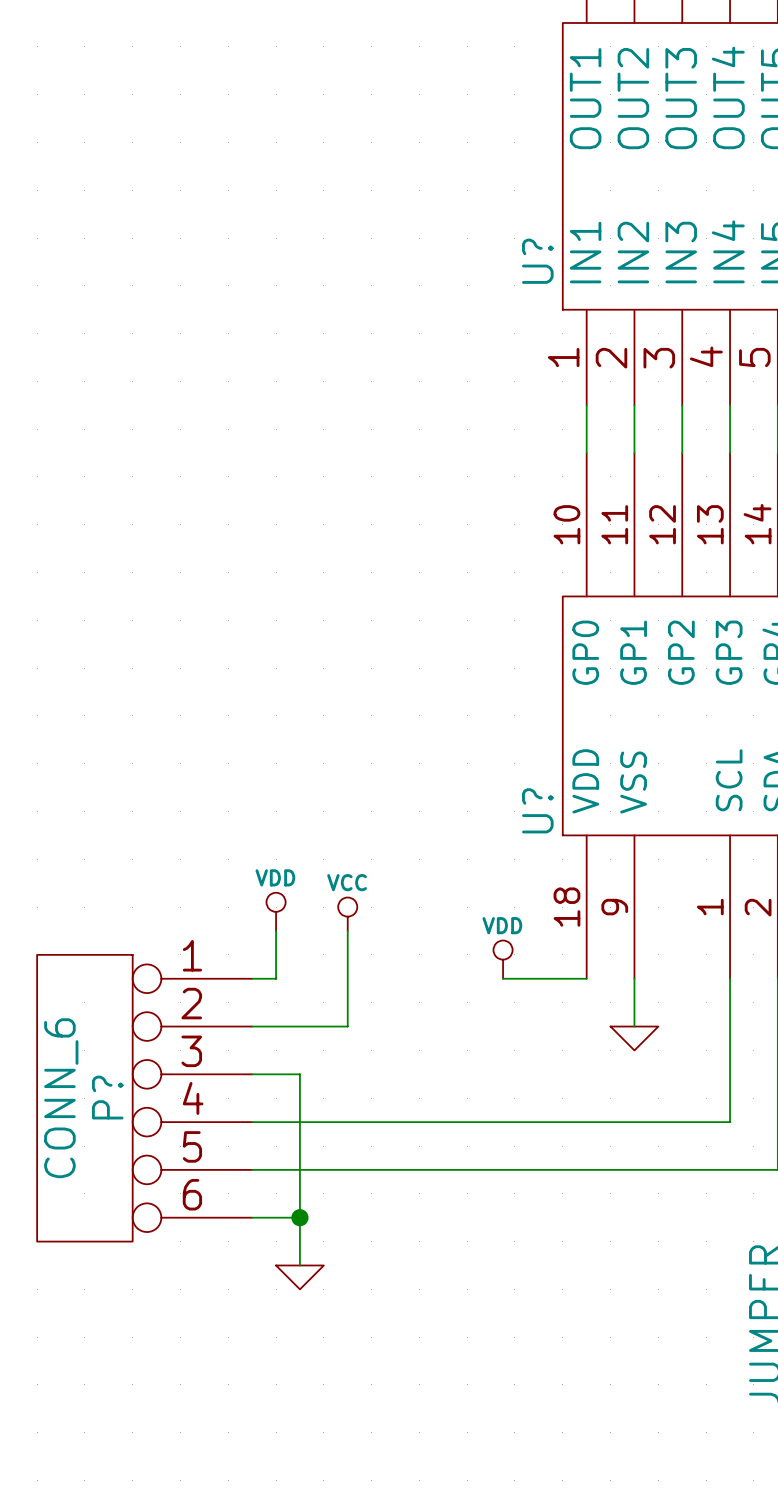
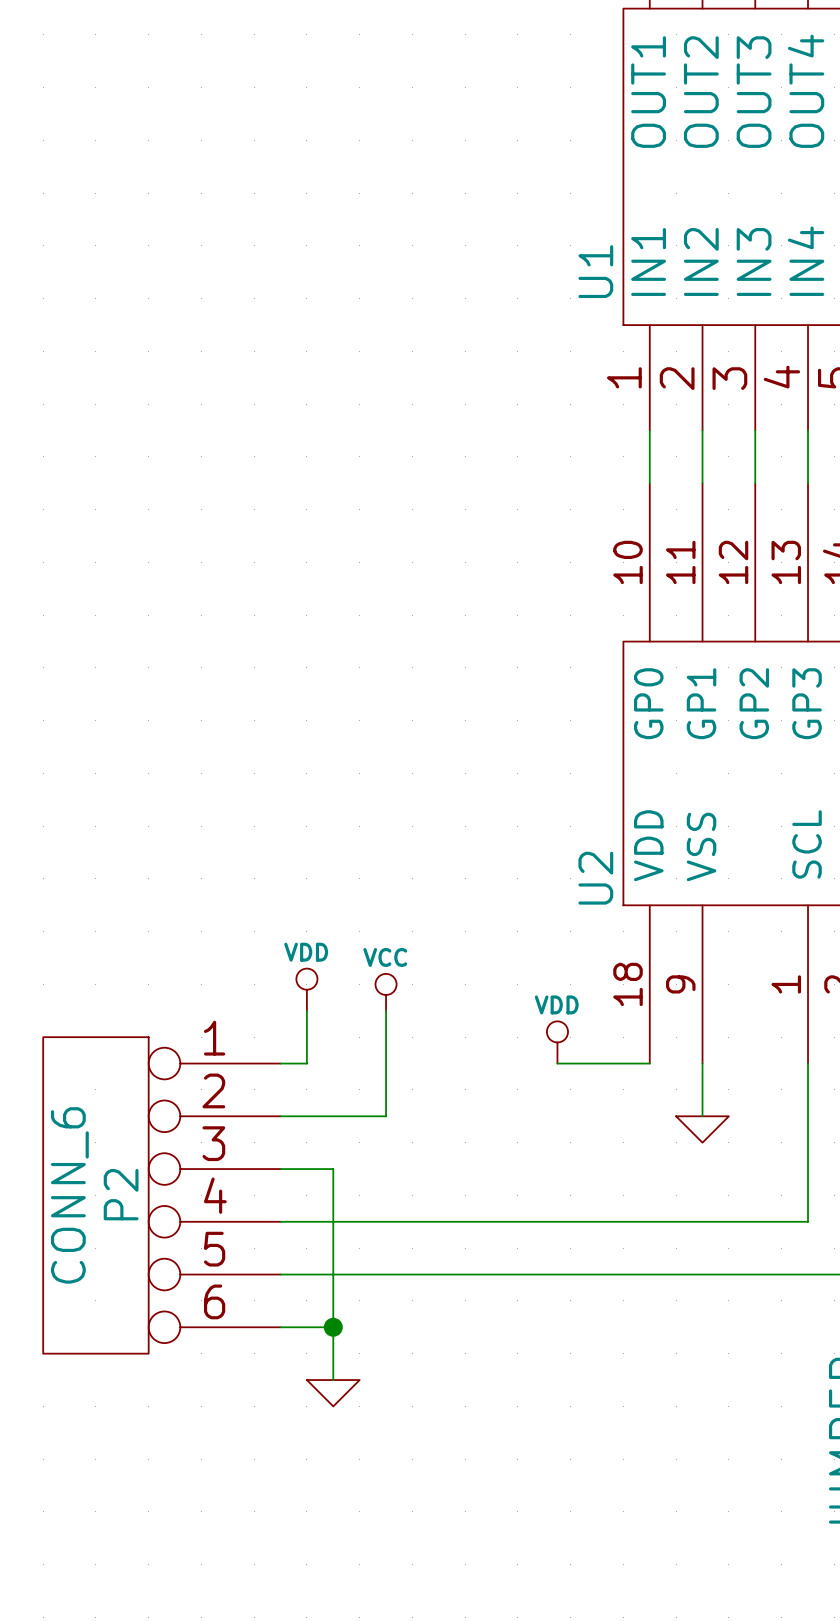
U? name: U? (537, 261) -> U1 (595, 271)
U? name: U? (537, 810) -> U2 (595, 878)
P? name: P? (107, 1097) -> P2 (121, 1194)

